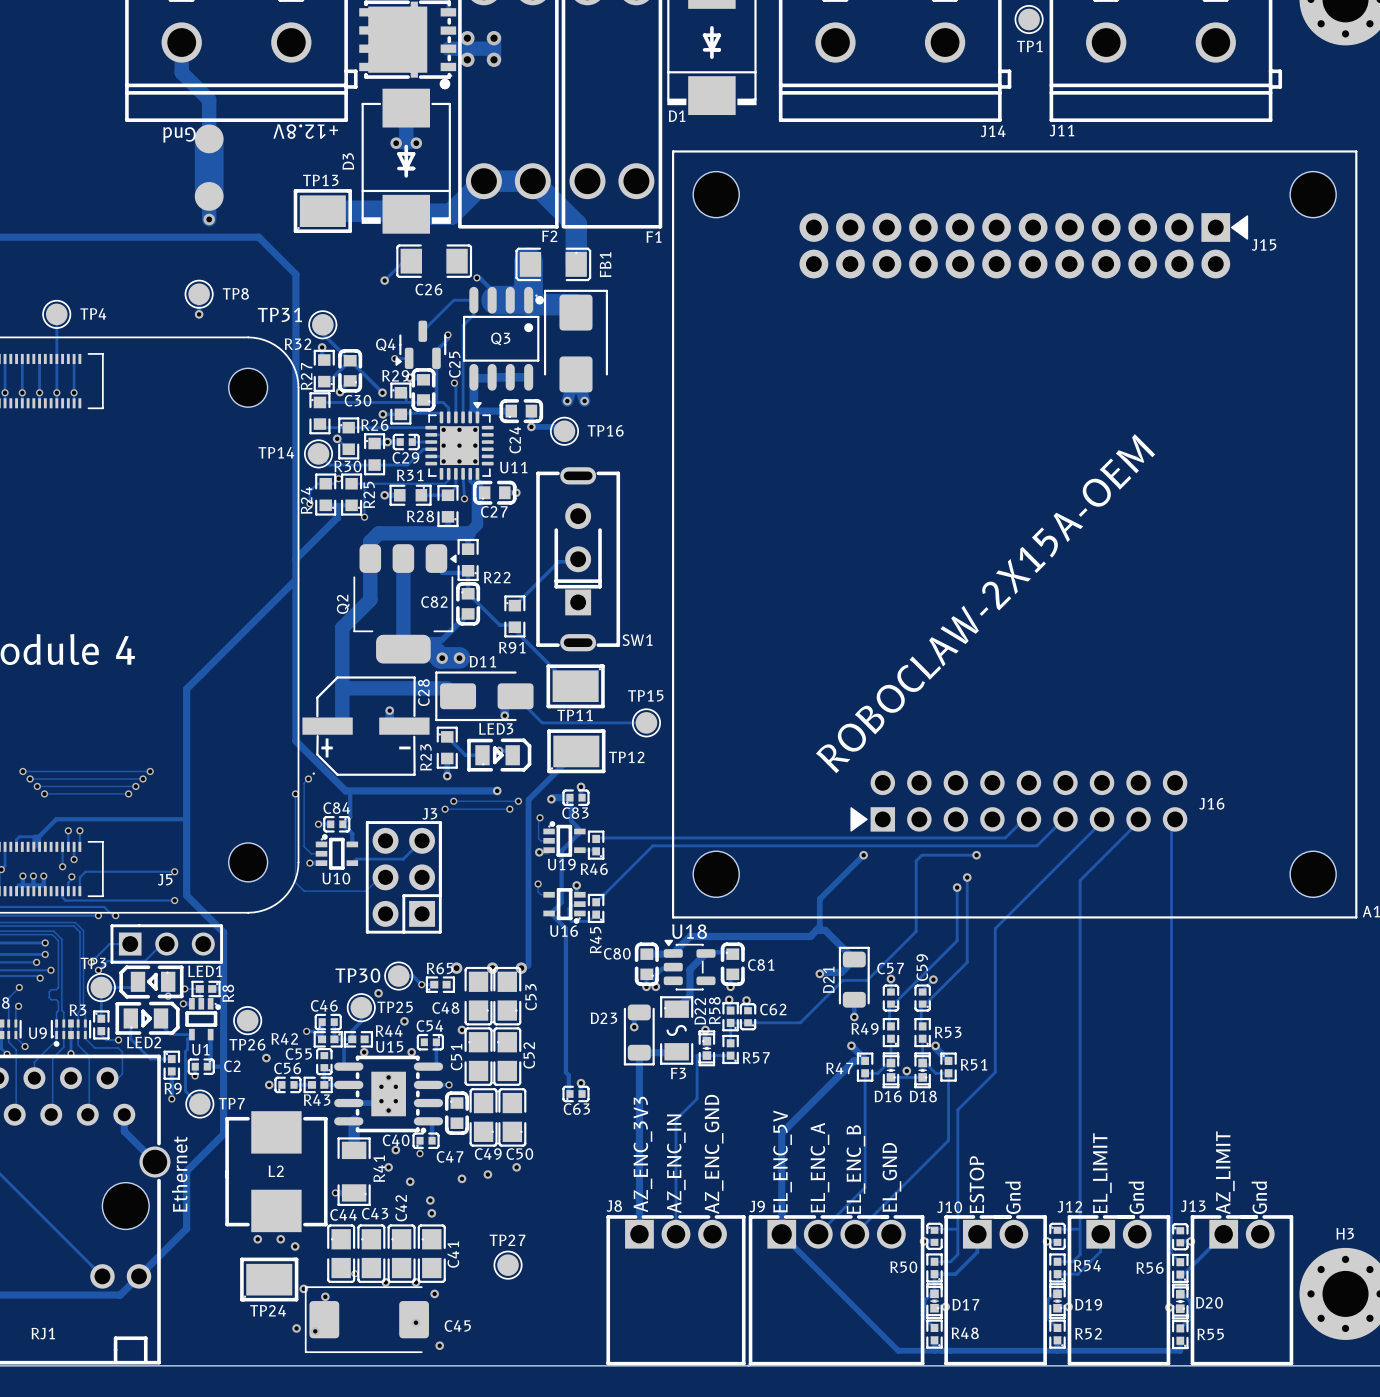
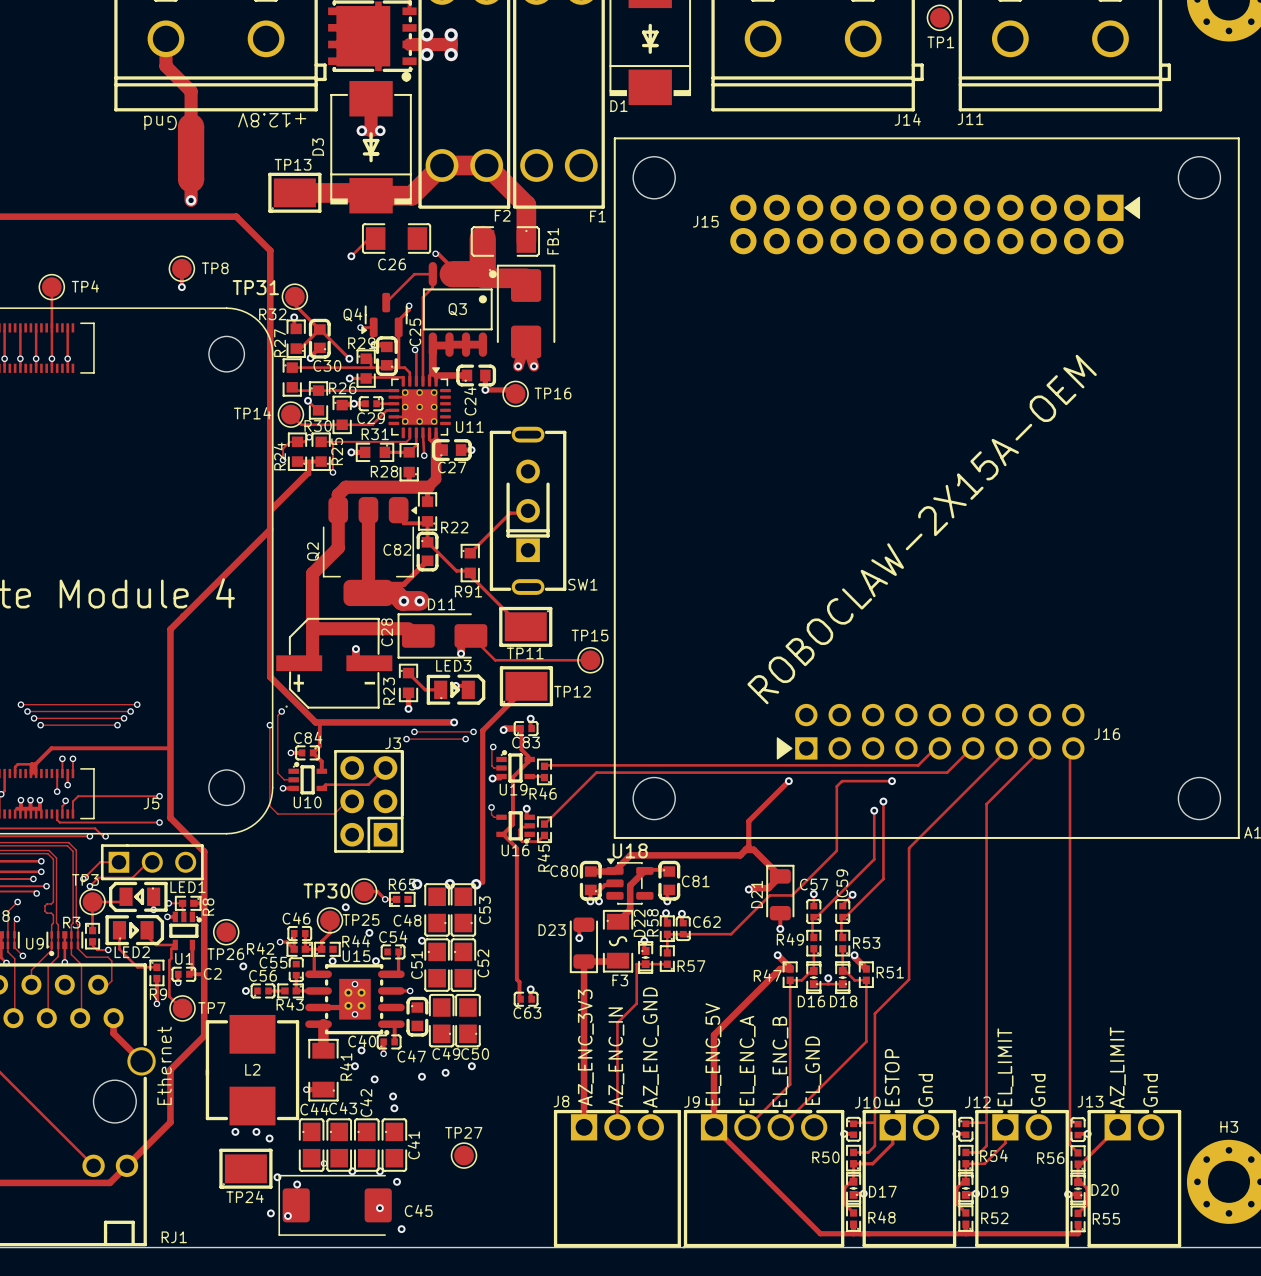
J15 position: (1264, 244) -> (705, 221)
RJ1 name position: RJ1 (43, 1333) -> RJ1 (174, 1237)

